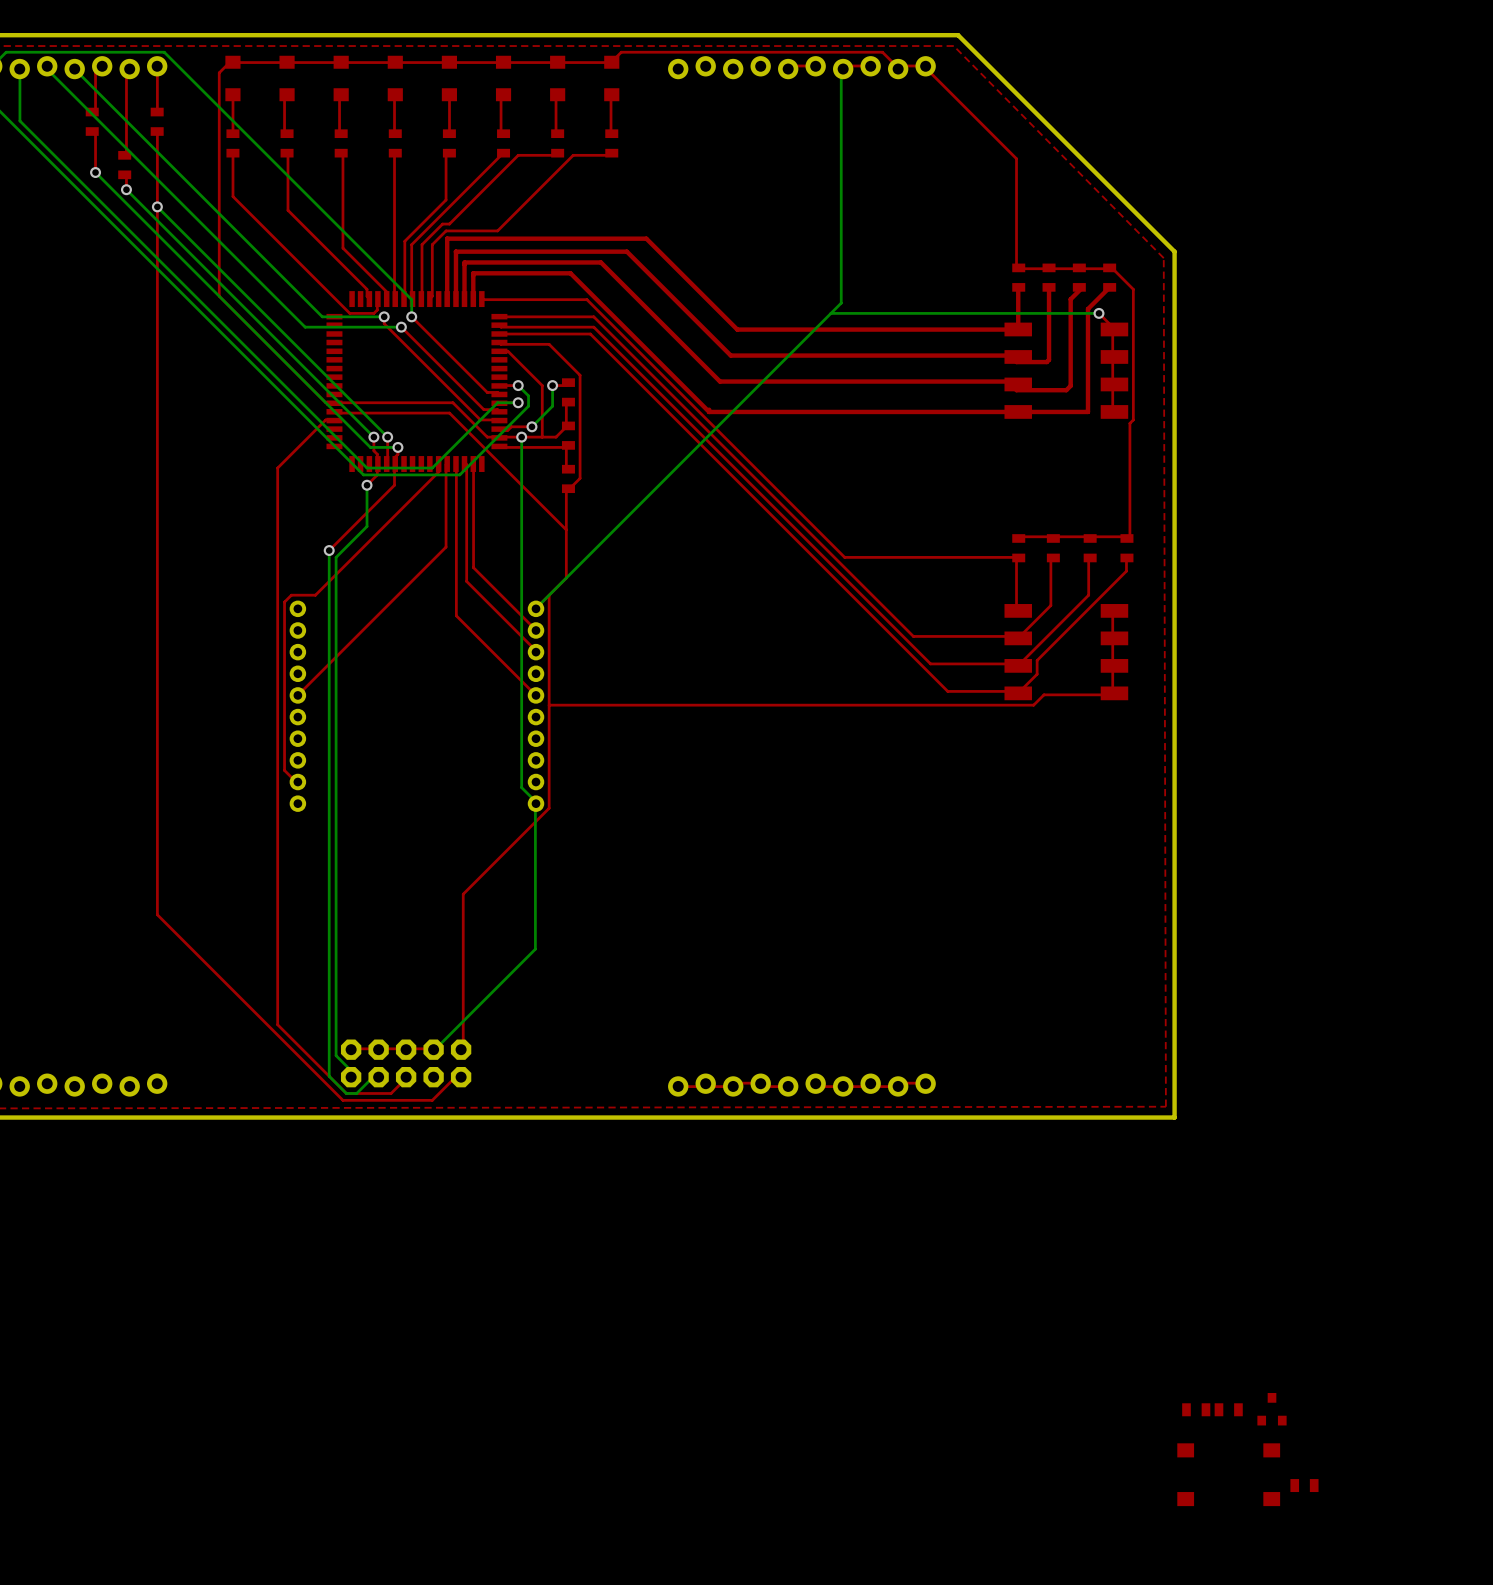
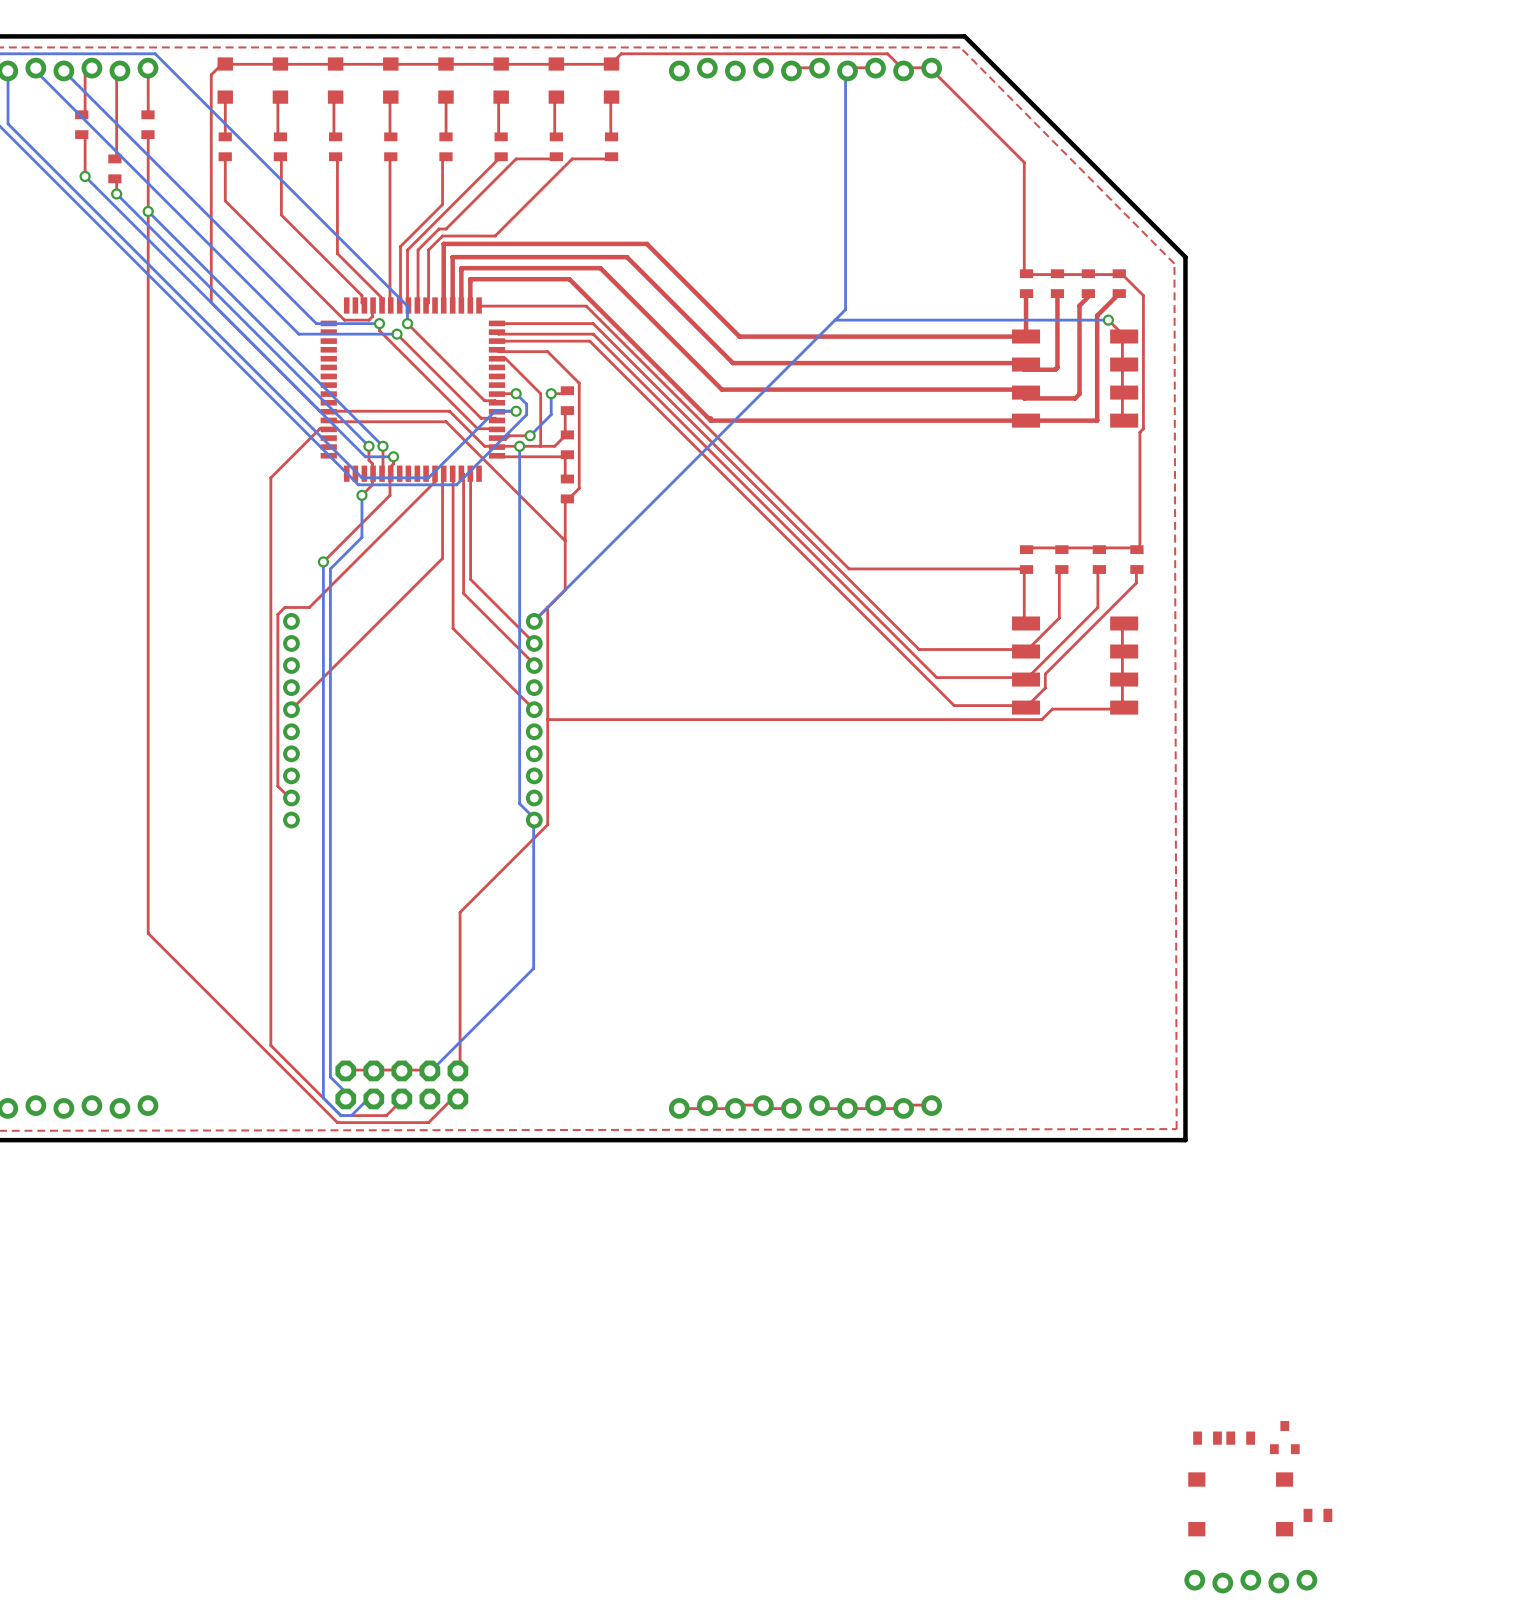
part: none -> (1250, 1581)

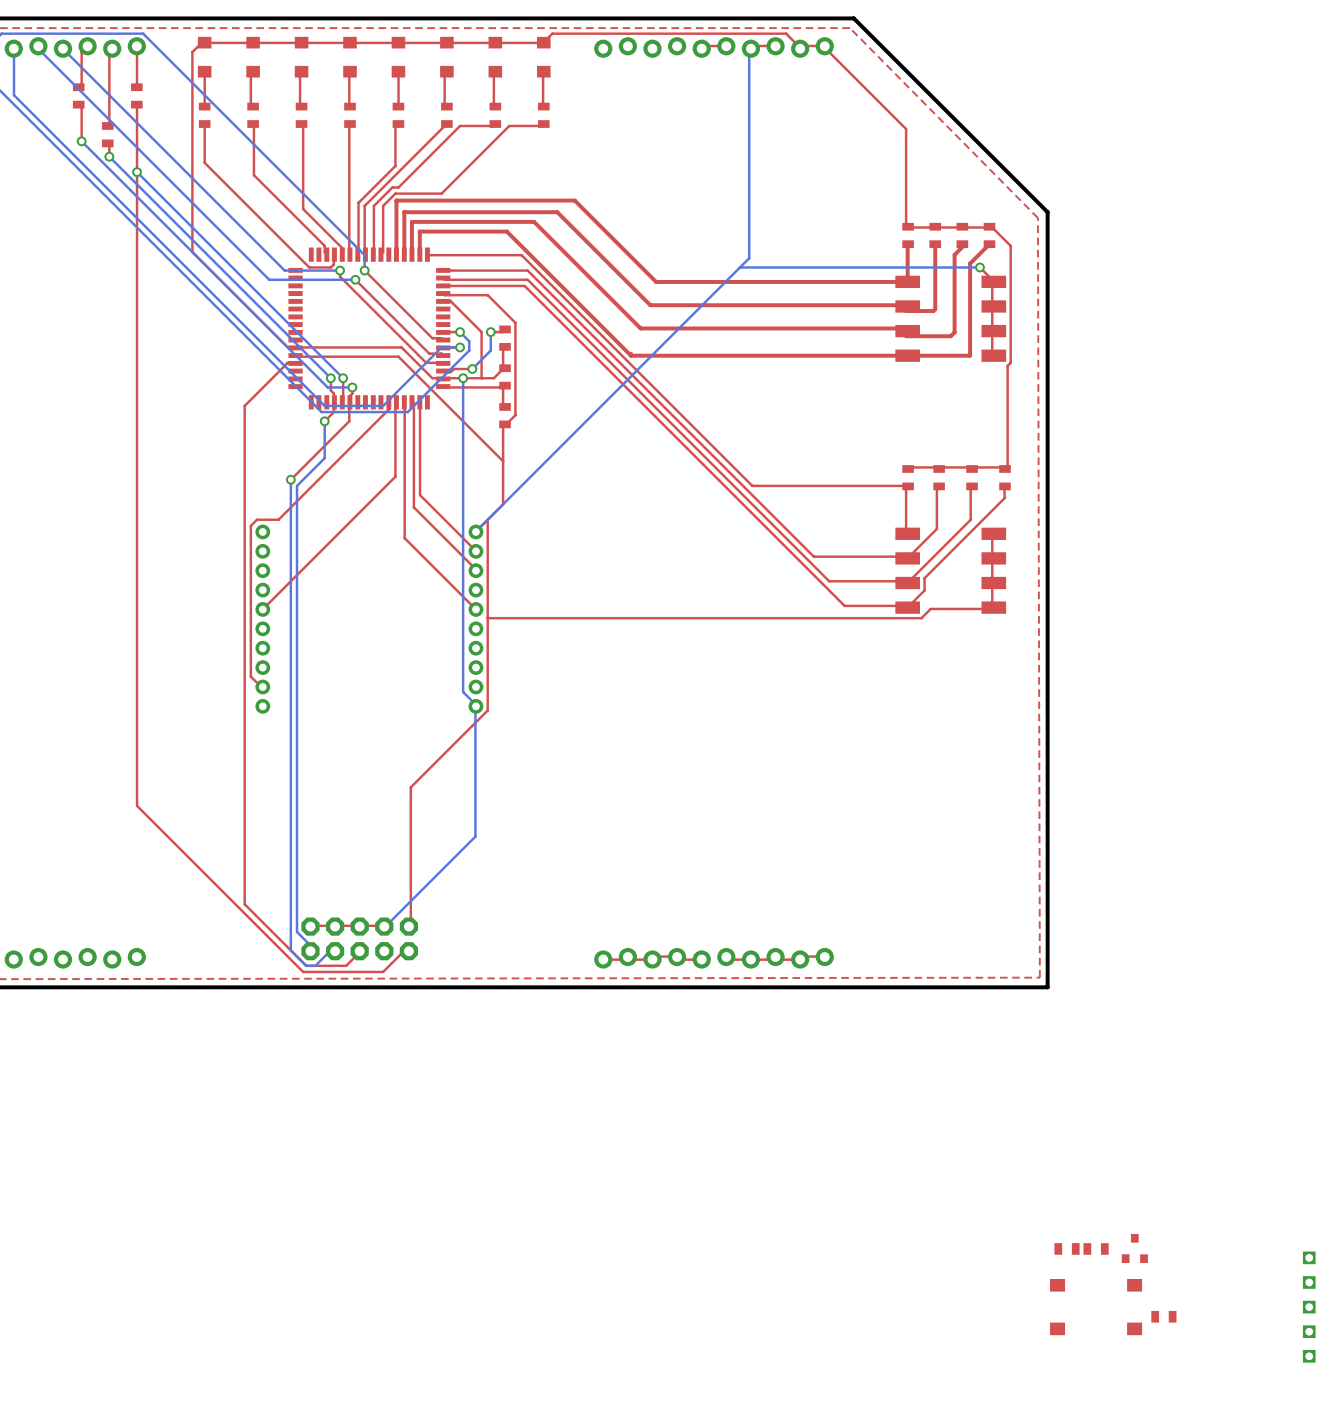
part: none -> (1309, 1307)
part: (1250, 1581) -> none

